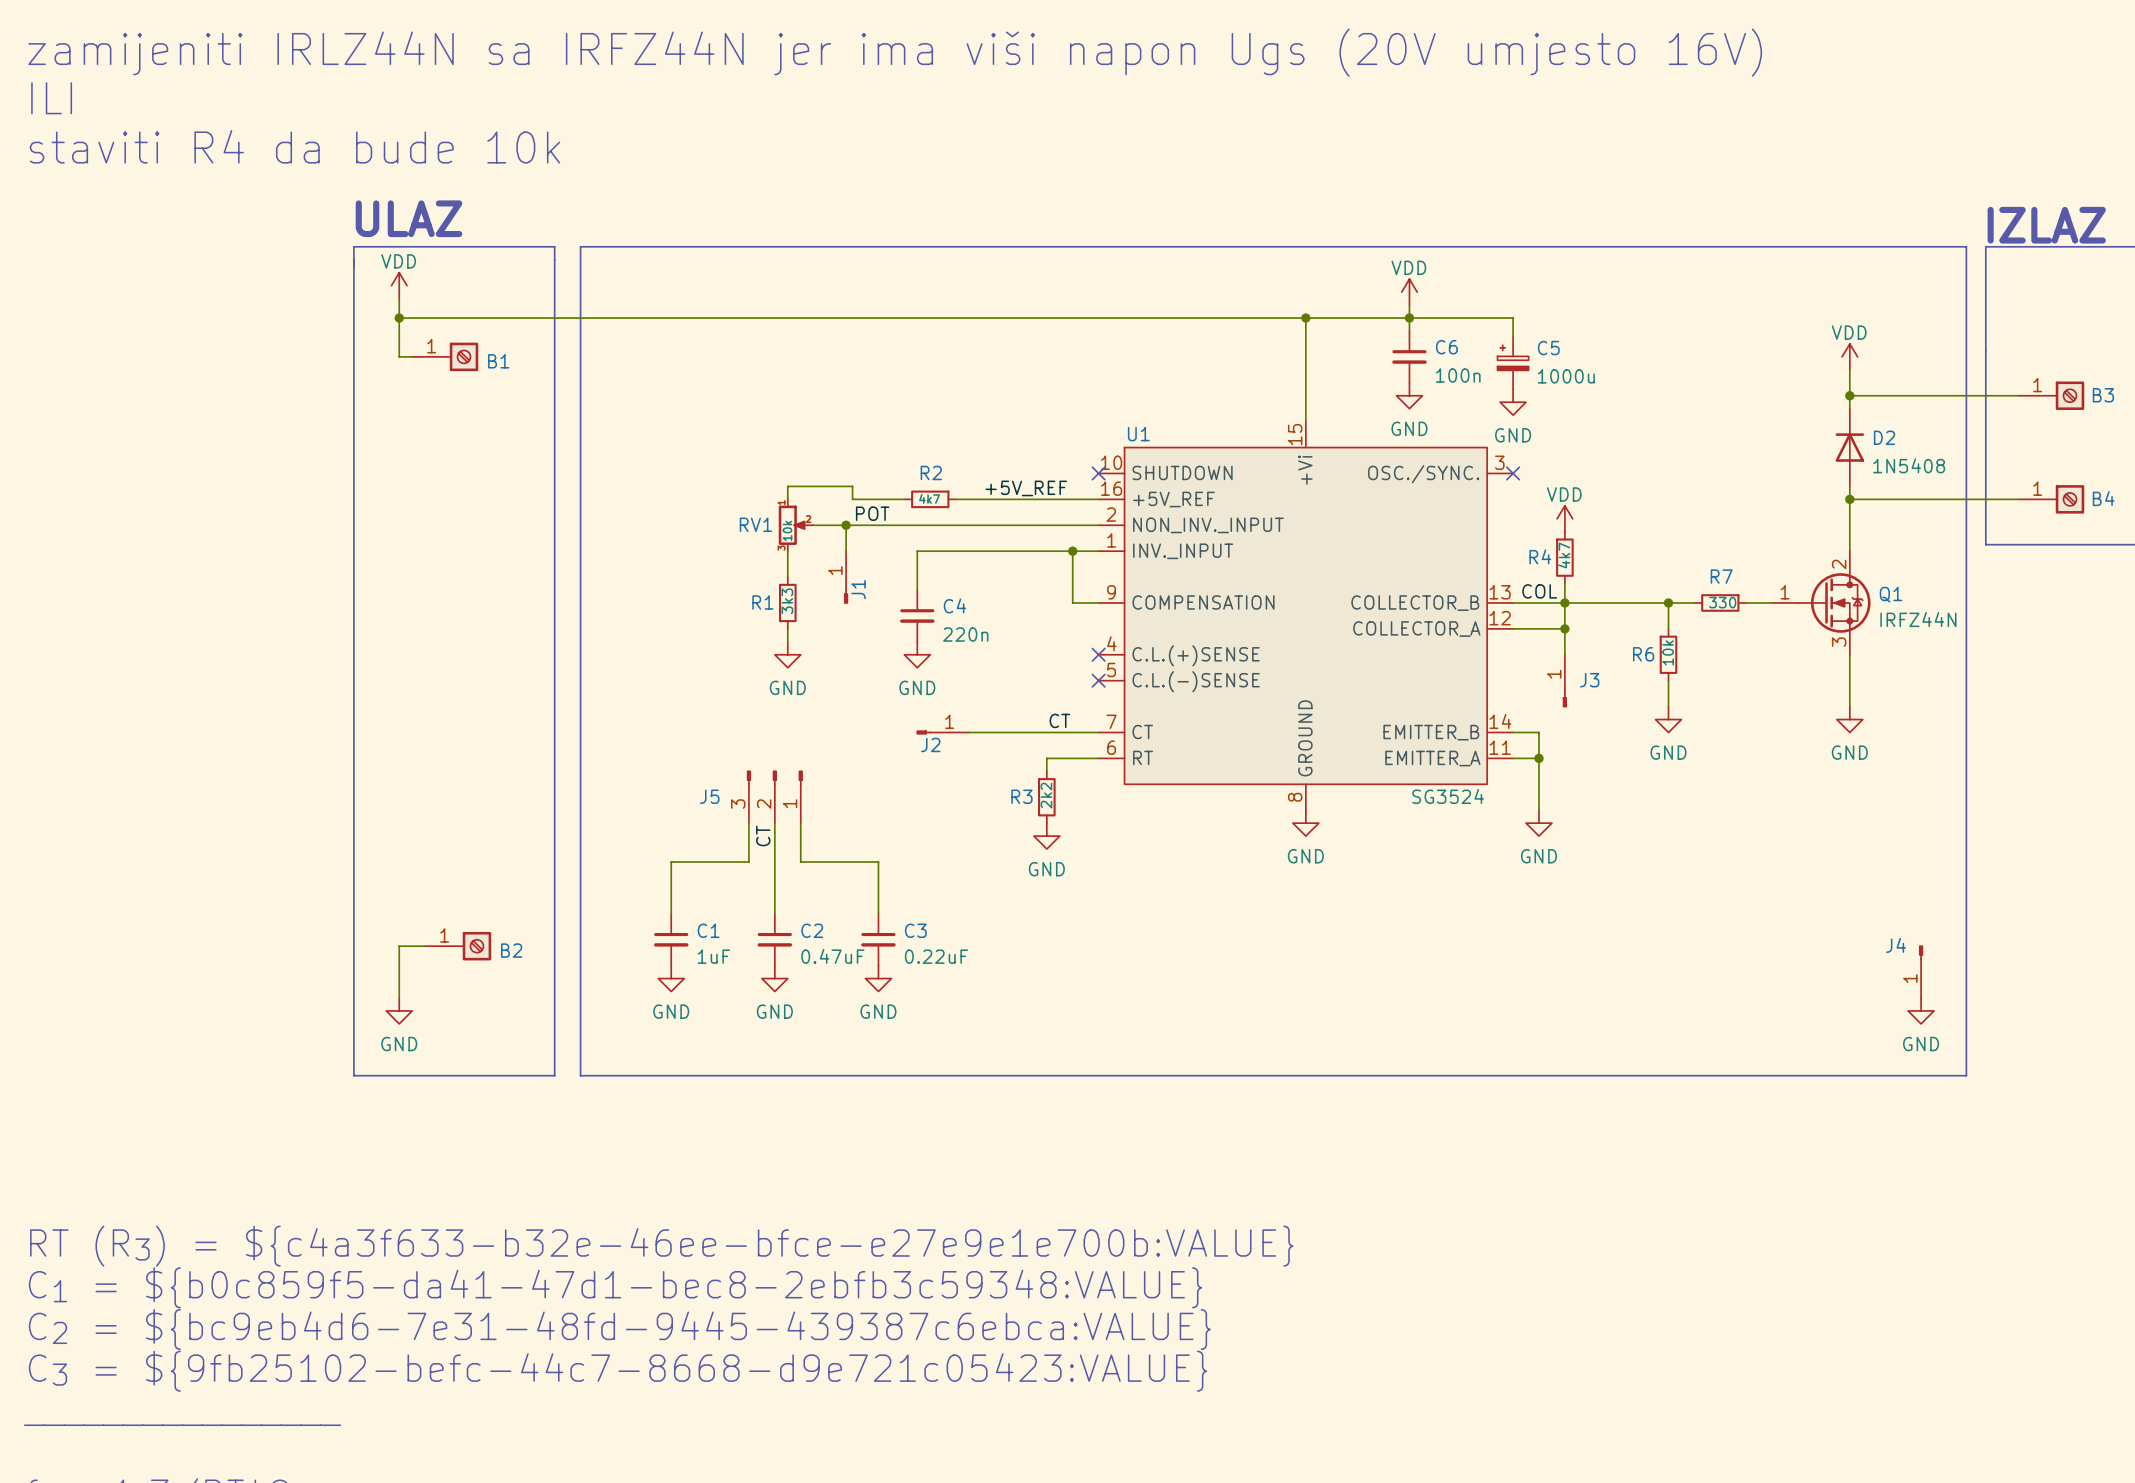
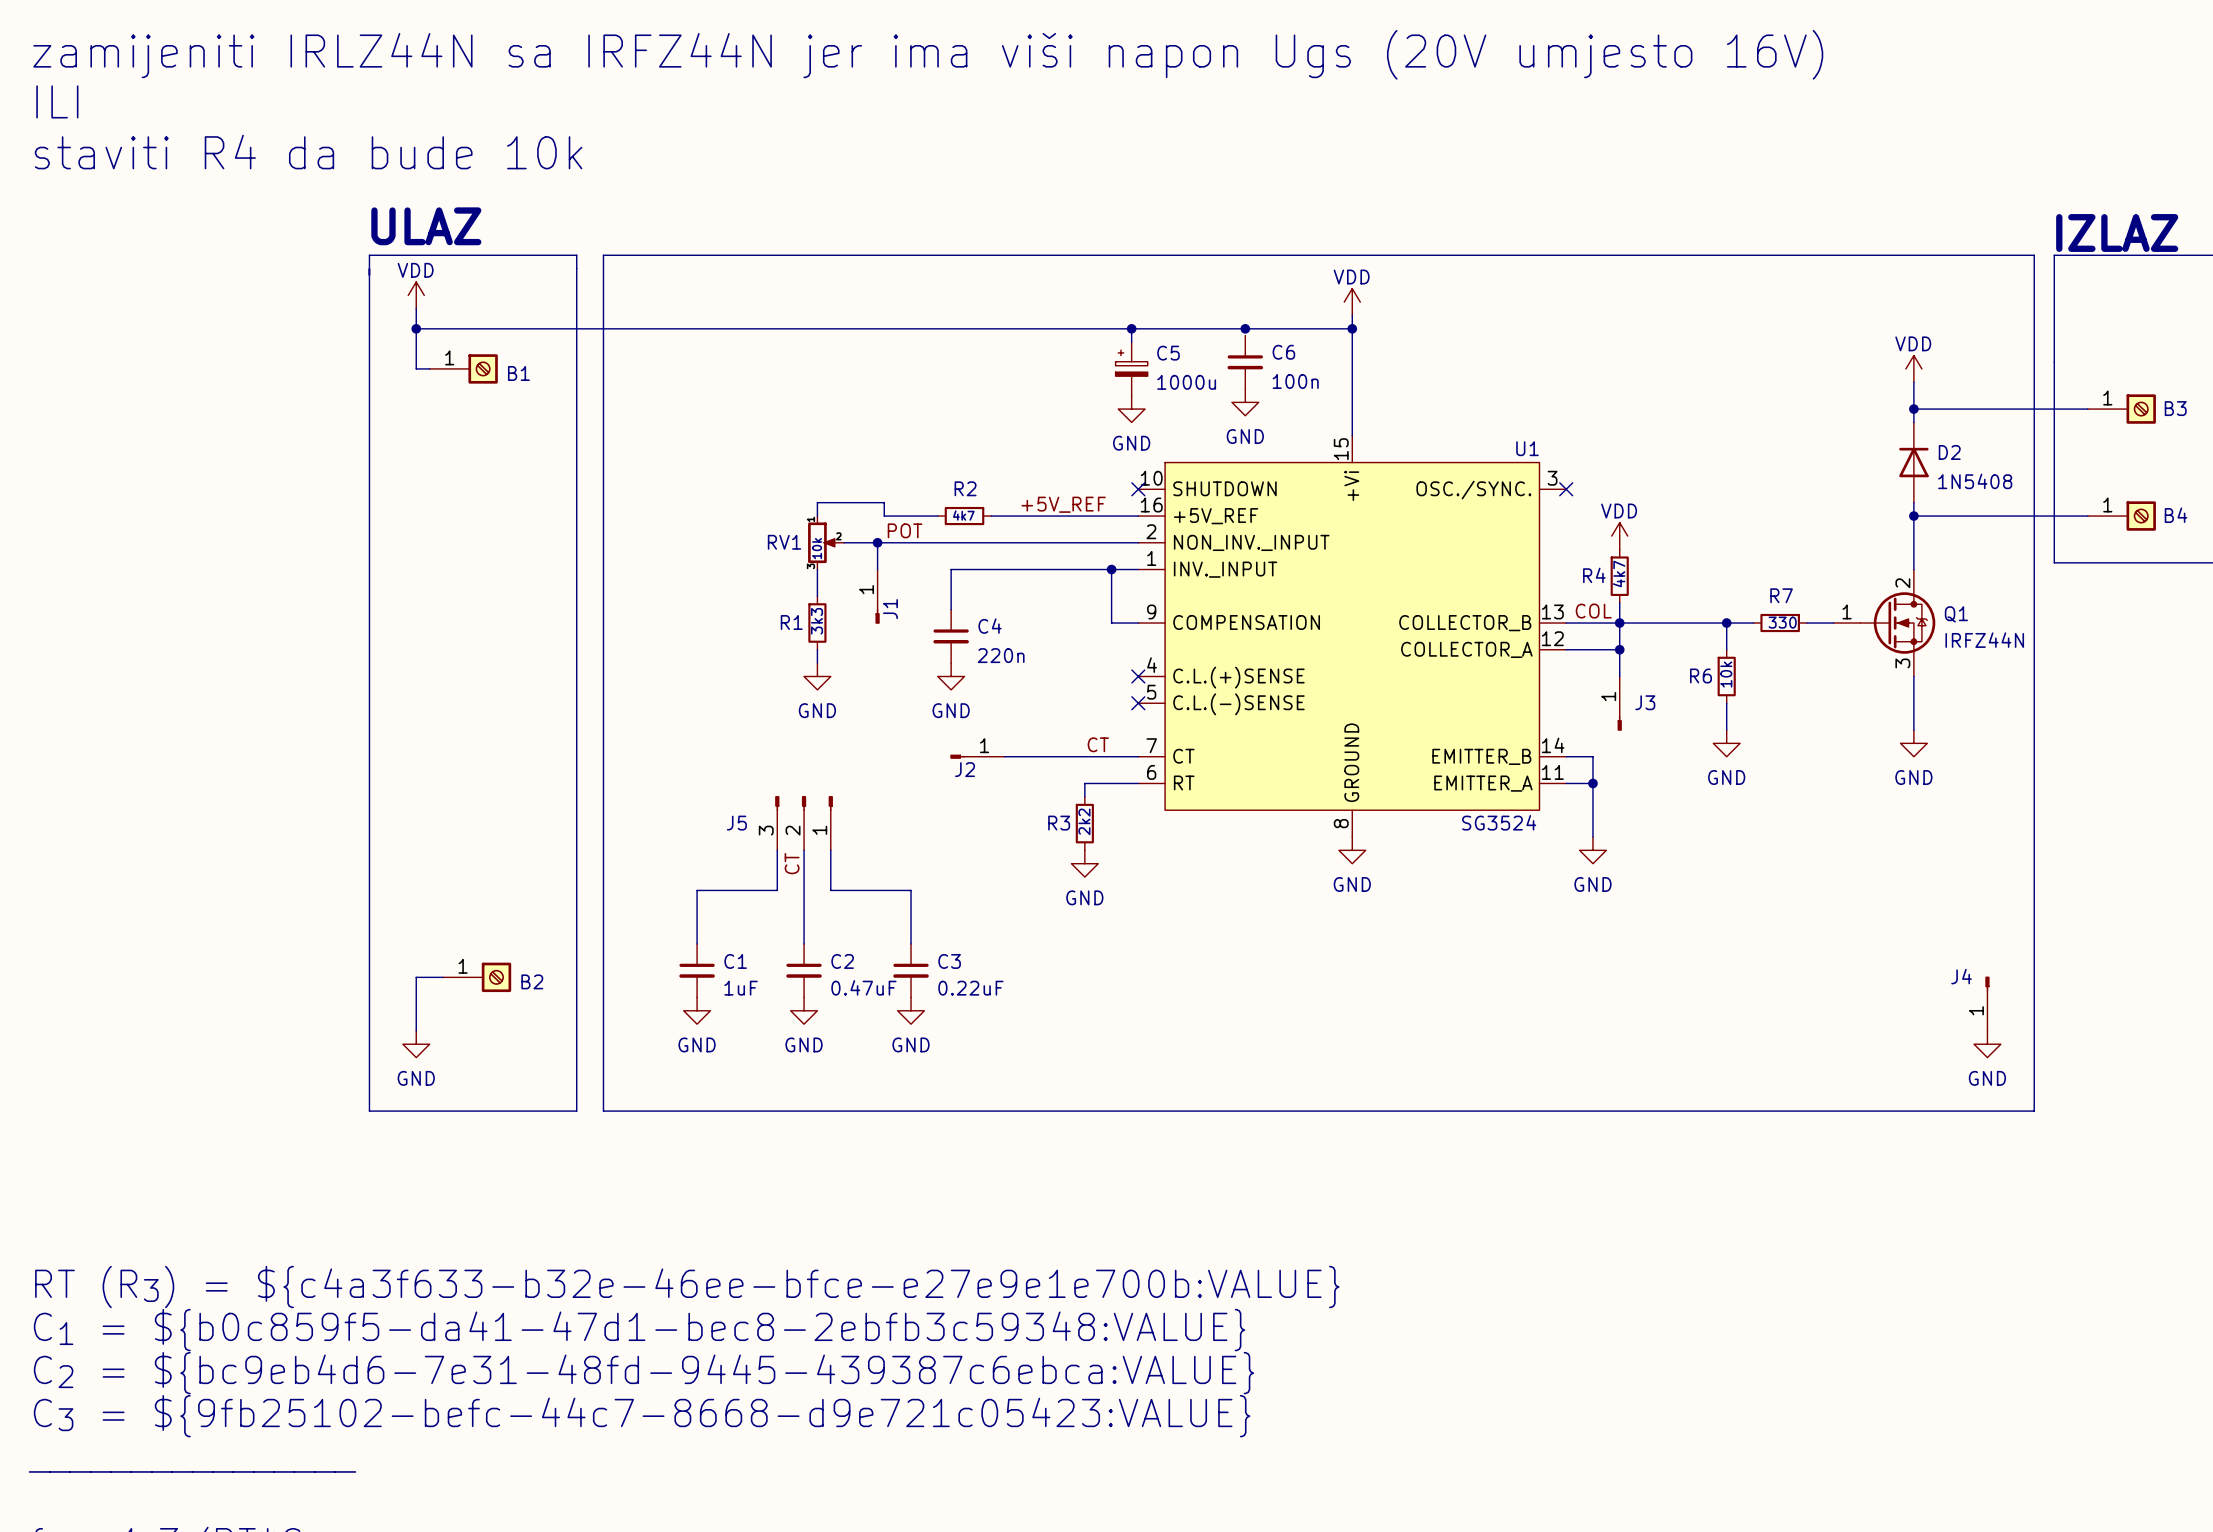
power symbol position: VDD (1409, 292) -> VDD (1352, 302)
wire: (1409, 305) (1409, 330) -> none
wire: none -> (1131, 328) (1131, 342)
junction: none -> (1131, 328)
junction: none -> (1245, 328)
wire: (1305, 318) (1513, 318) (1513, 337) -> (1352, 328) (1352, 315)
junction: (1409, 318) -> none
C6 position: (1409, 356) -> (1245, 362)
C5 position: (1513, 363) -> (1131, 368)
power symbol: none -> GND (1245, 402)
power symbol: none -> GND (1131, 409)
power symbol: GND (1409, 395) -> none
power symbol: GND (1513, 402) -> none
U1 name position: U1 (1138, 434) -> U1 (1527, 448)

